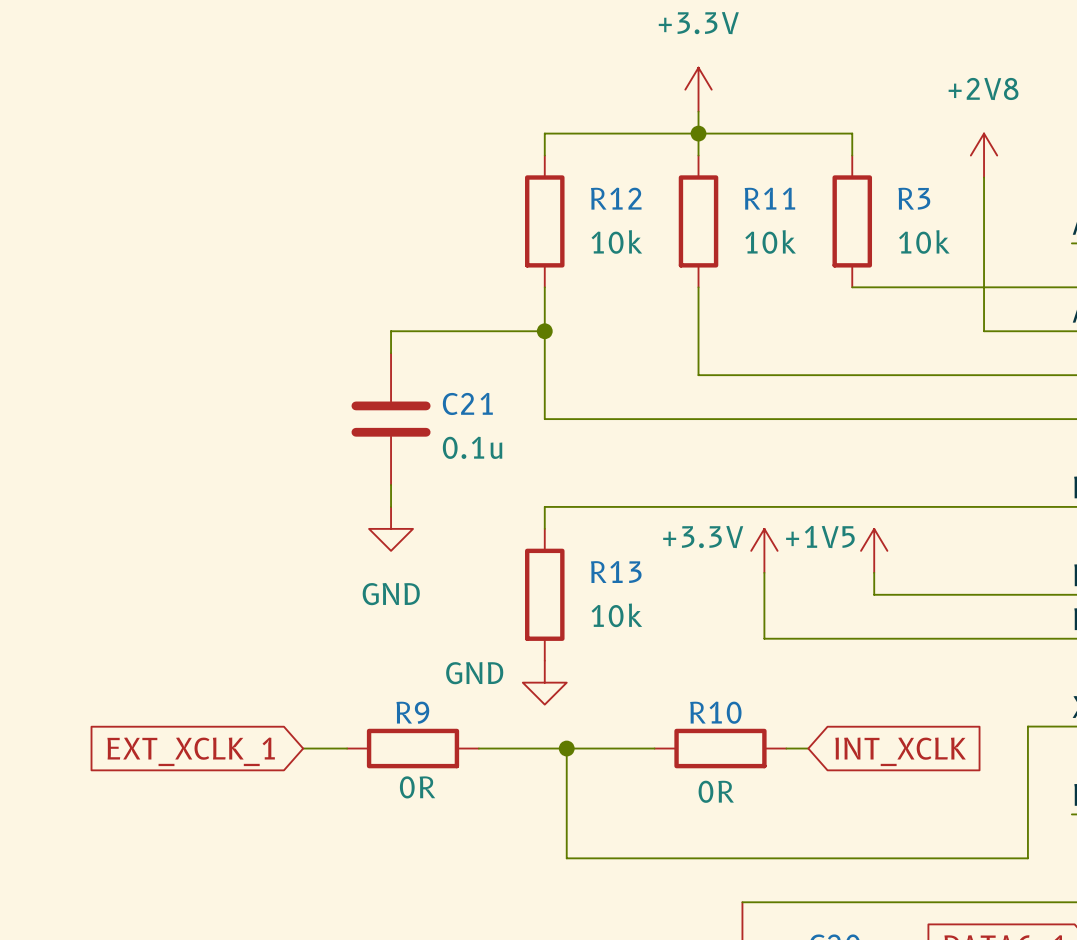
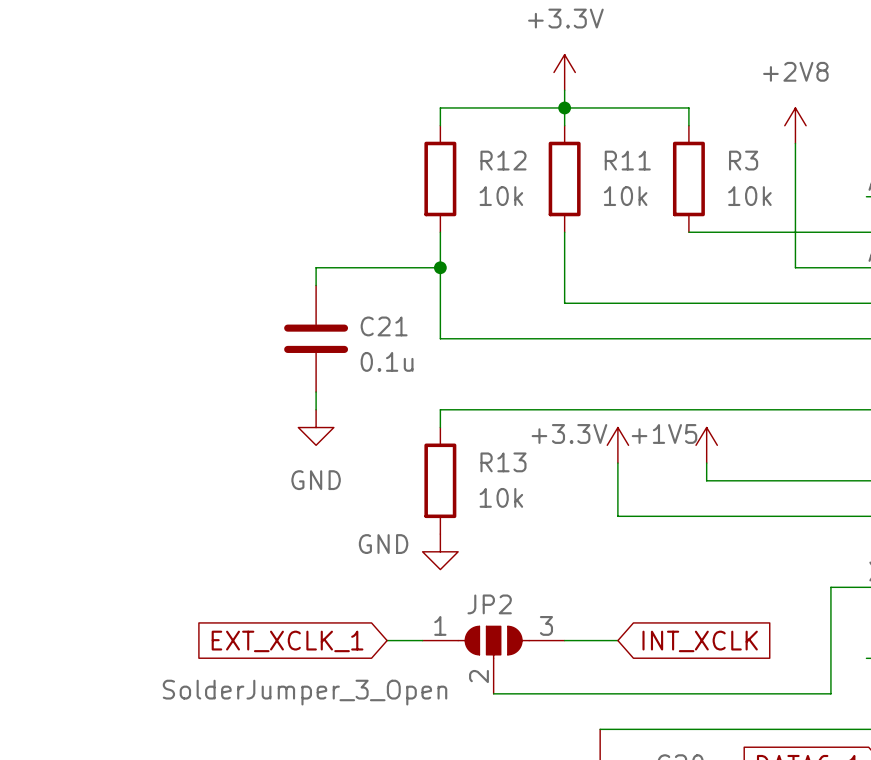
wire: (303, 748) (347, 748) -> (387, 640) (422, 640)
R9: 0R (413, 748) -> none
wire: (478, 748) (654, 748) -> none
wire: (566, 748) (566, 858) (610, 858) -> none
junction: (566, 748) -> none
R10: 0R (720, 748) -> none
wire: (786, 748) (808, 748) -> none
global label position: EXT_XCLK_1 (191, 751) -> EXT_XCLK_1 (287, 641)
global label position: INT_XCLK (900, 751) -> INT_XCLK (700, 641)
wire: none -> (564, 640) (617, 640)
JP2: none -> SolderJumper_3_Open (493, 660)

